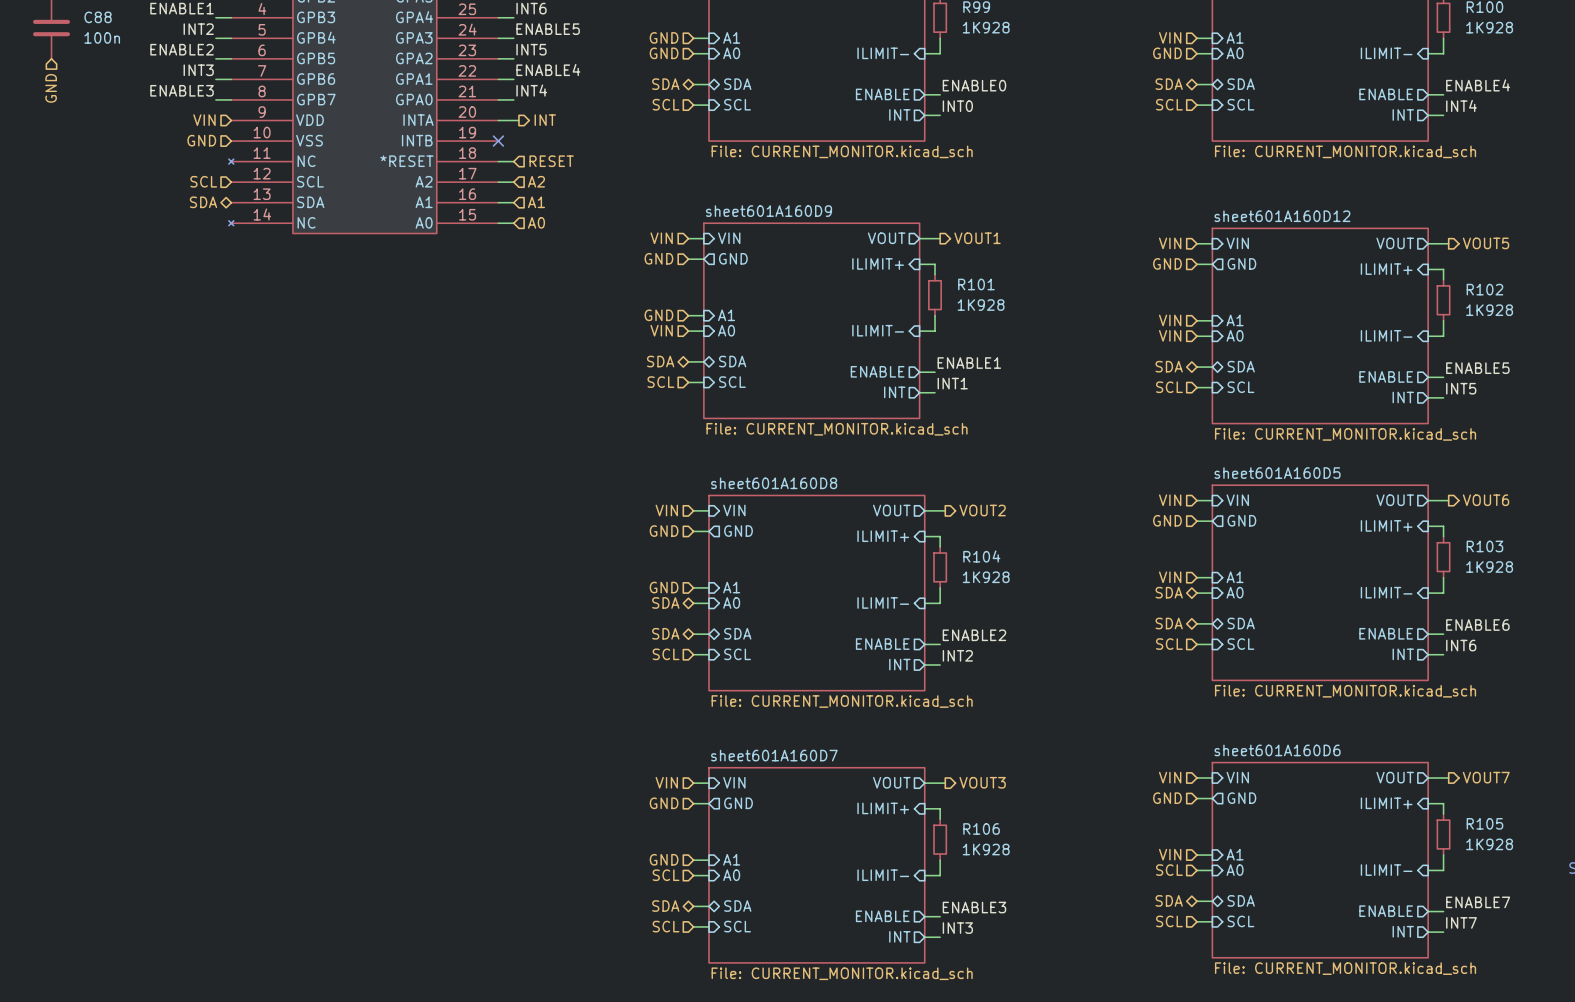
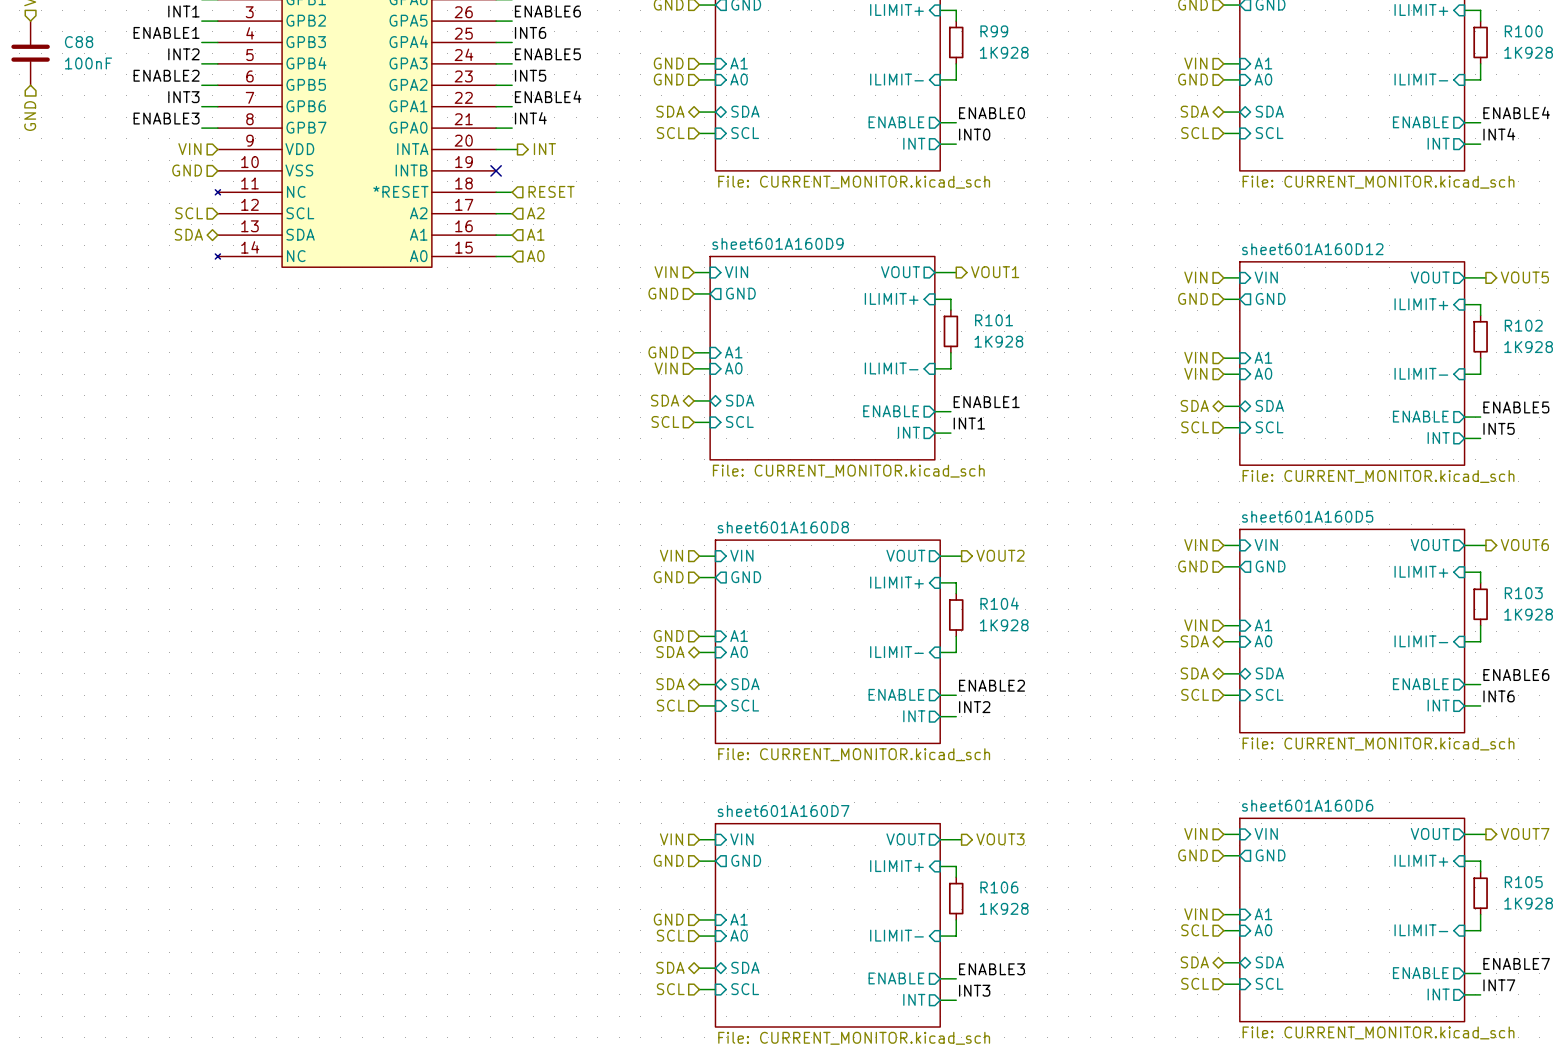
C88 value: 100n (102, 37) -> 100nF (88, 63)

